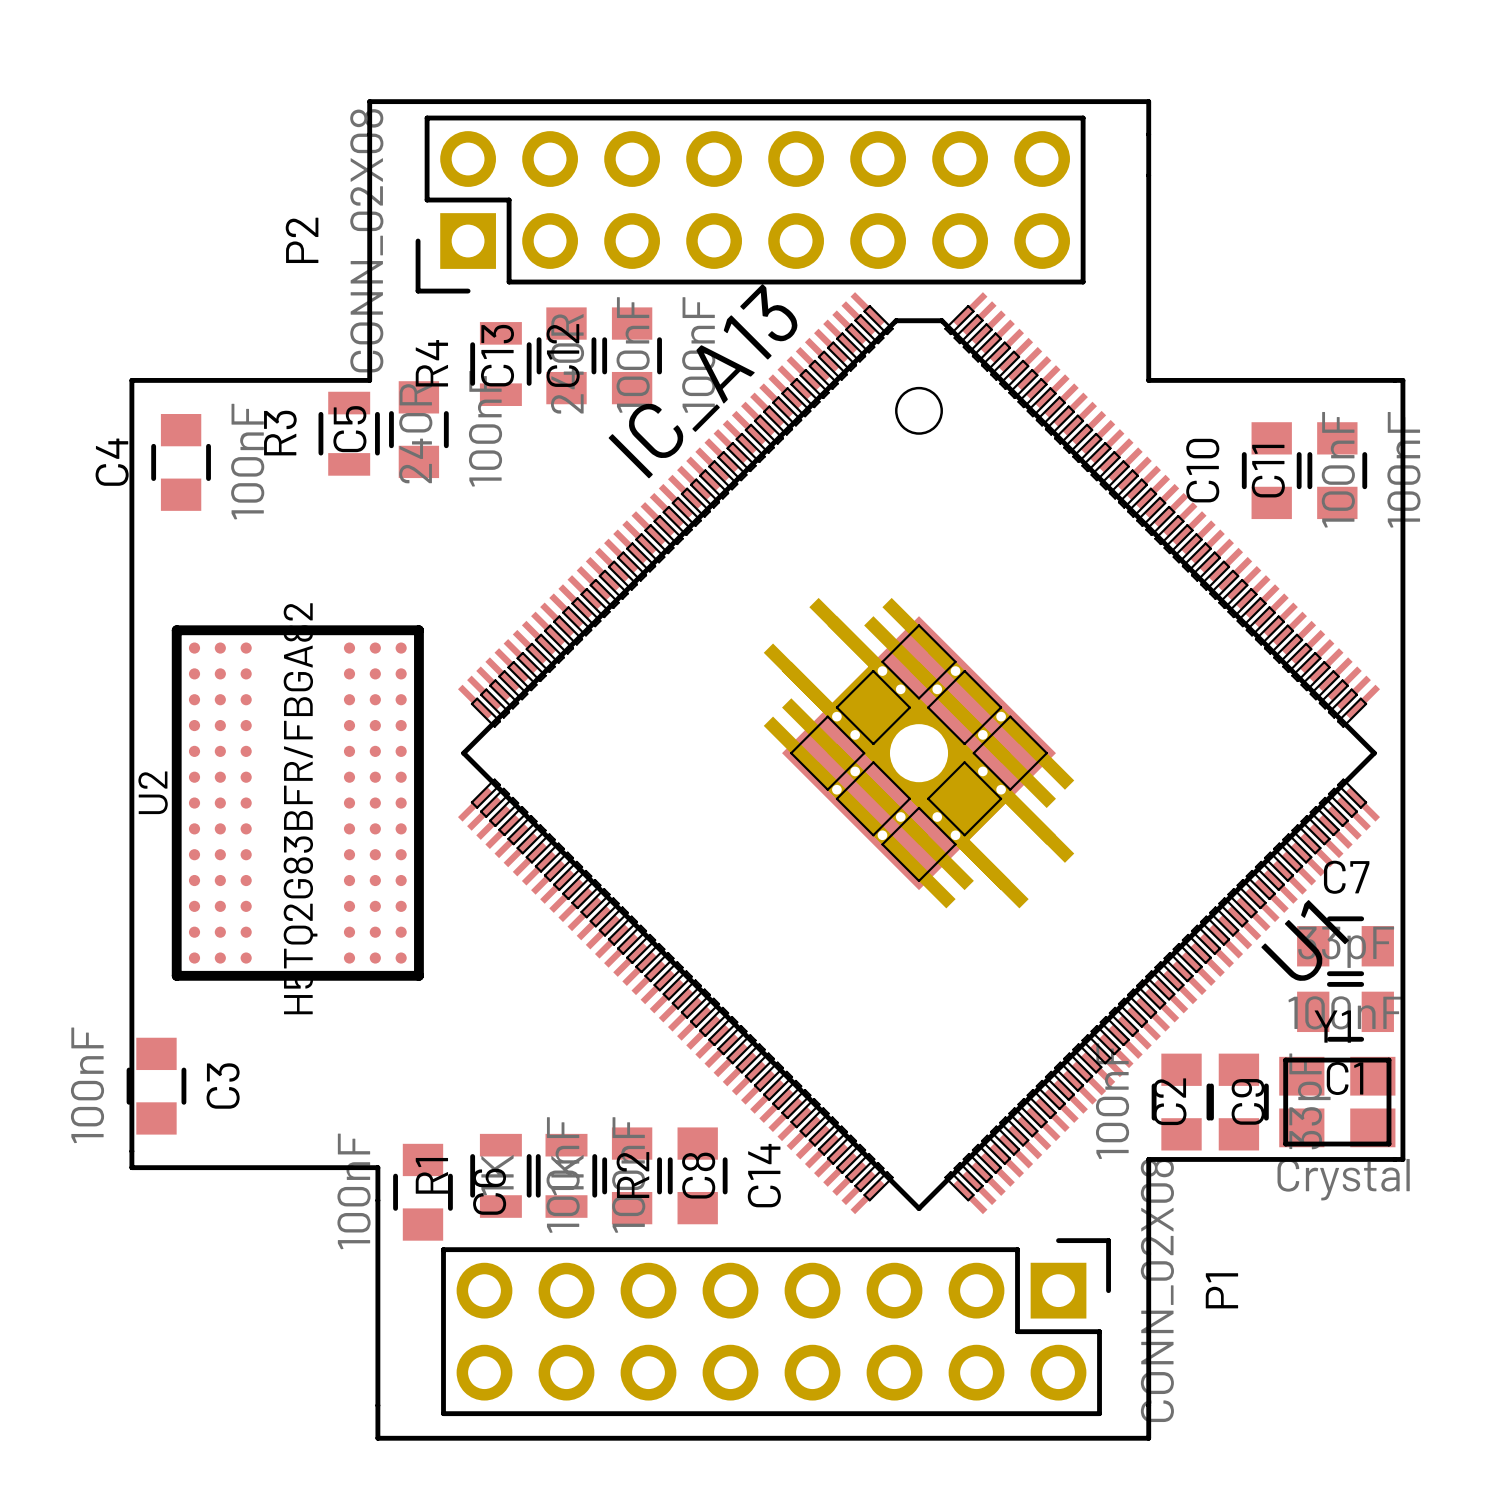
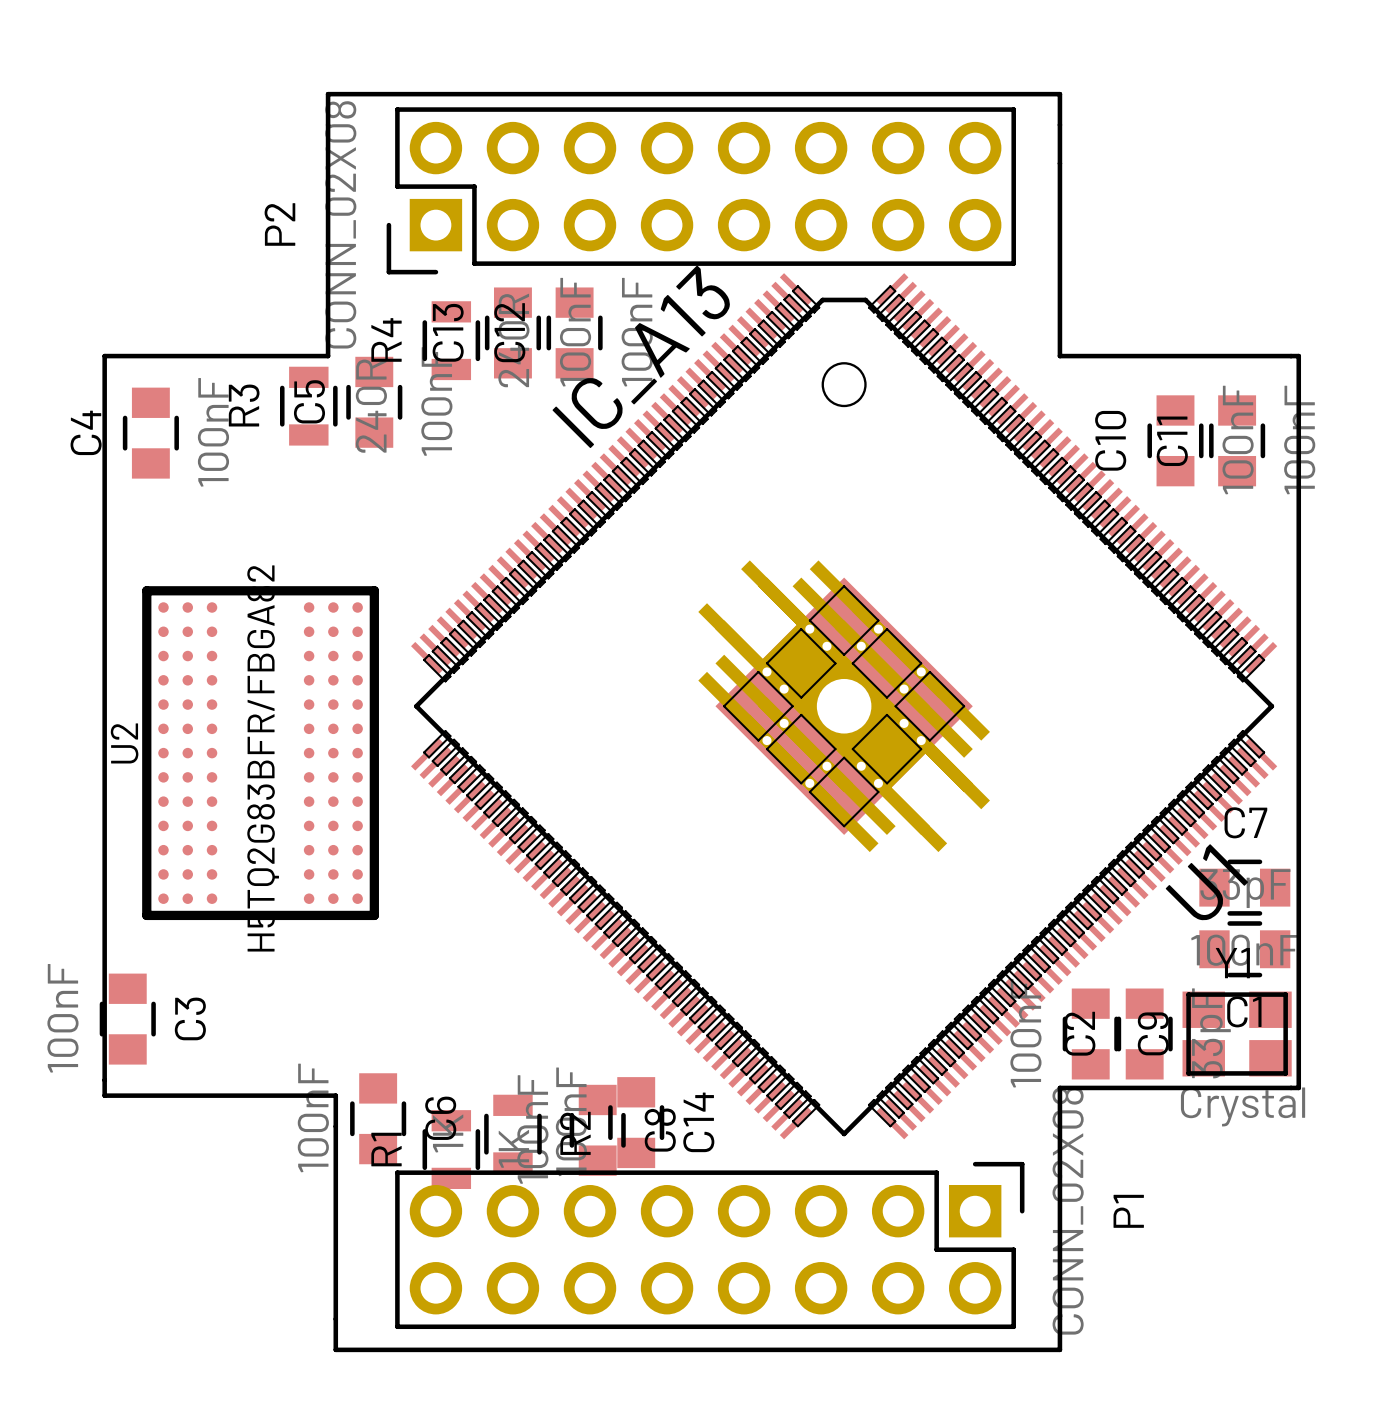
P2 position: (750, 204) -> (701, 190)
R1 position: (500, 1175) -> (451, 1149)
R2 position: (566, 1175) -> (512, 1134)
C8 position: (632, 1175) -> (597, 1130)
C14 position: (697, 1175) -> (636, 1122)

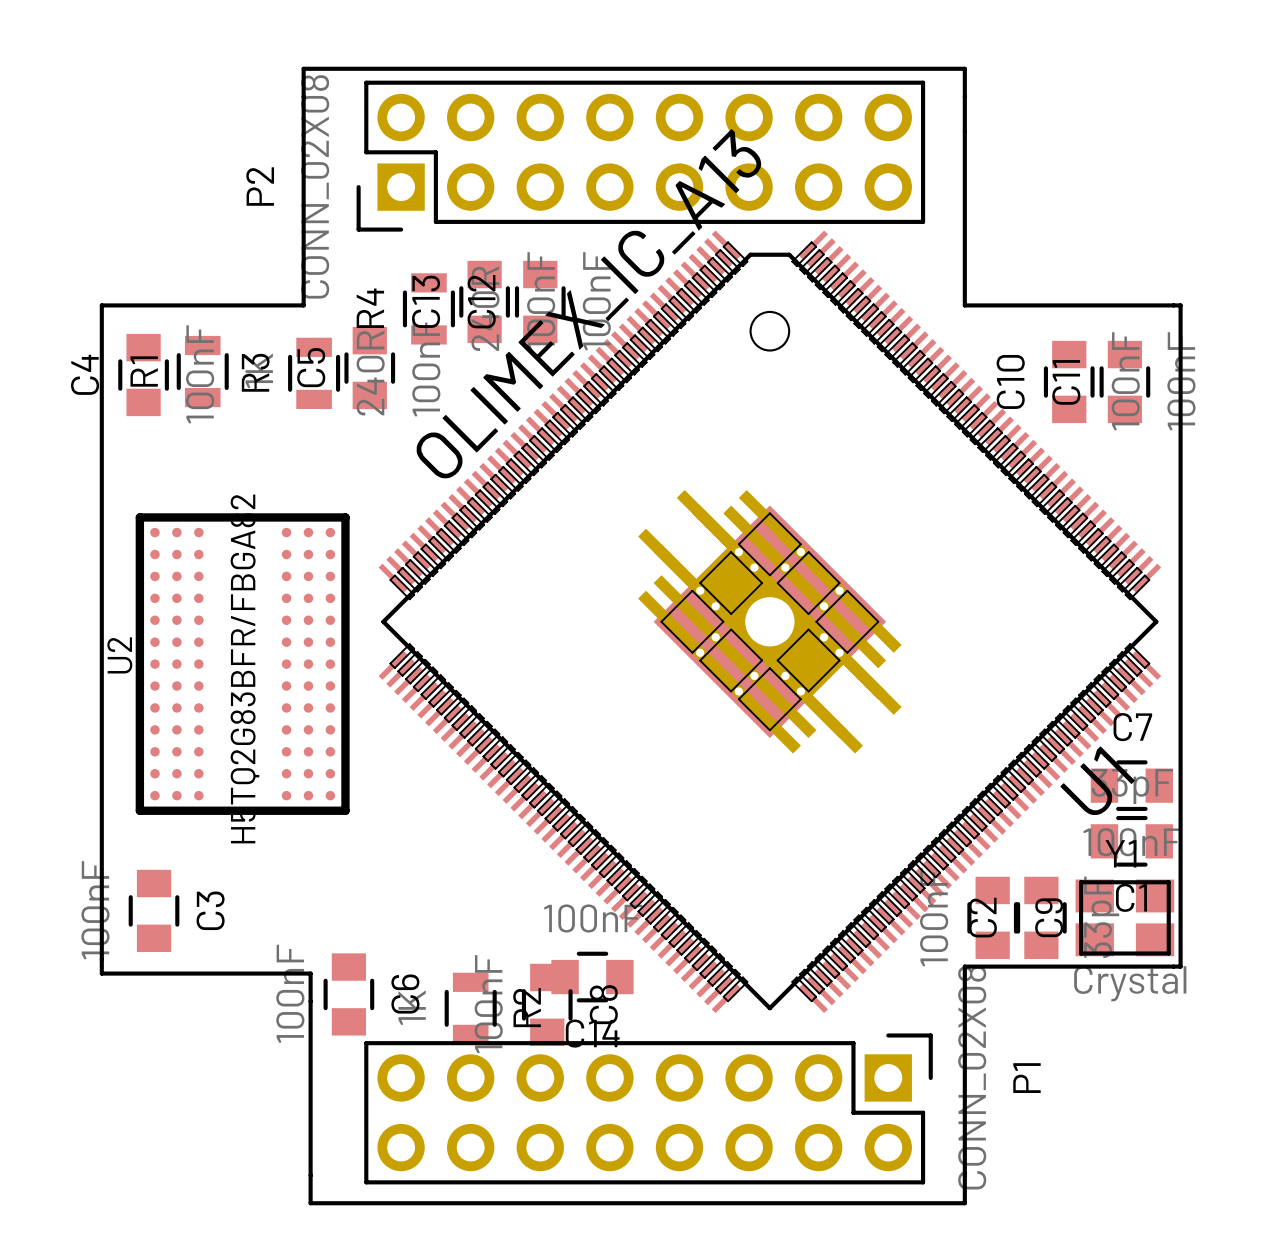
C13 position: (512, 332) -> (484, 301)
C12 position: (574, 332) -> (540, 301)
R4 position: (451, 340) -> (428, 308)
U1 value: IC_A13 (641, 356) -> OLIMEX_IC_A13 (588, 303)
C5 position: (374, 402) -> (369, 368)
R3 position: (308, 406) -> (314, 373)
C3 position: (127, 1019) -> (154, 910)
C14 rotation: 0° (636, 1122) -> 90° clockwise (592, 977)
R1 position: (451, 1149) -> (202, 371)

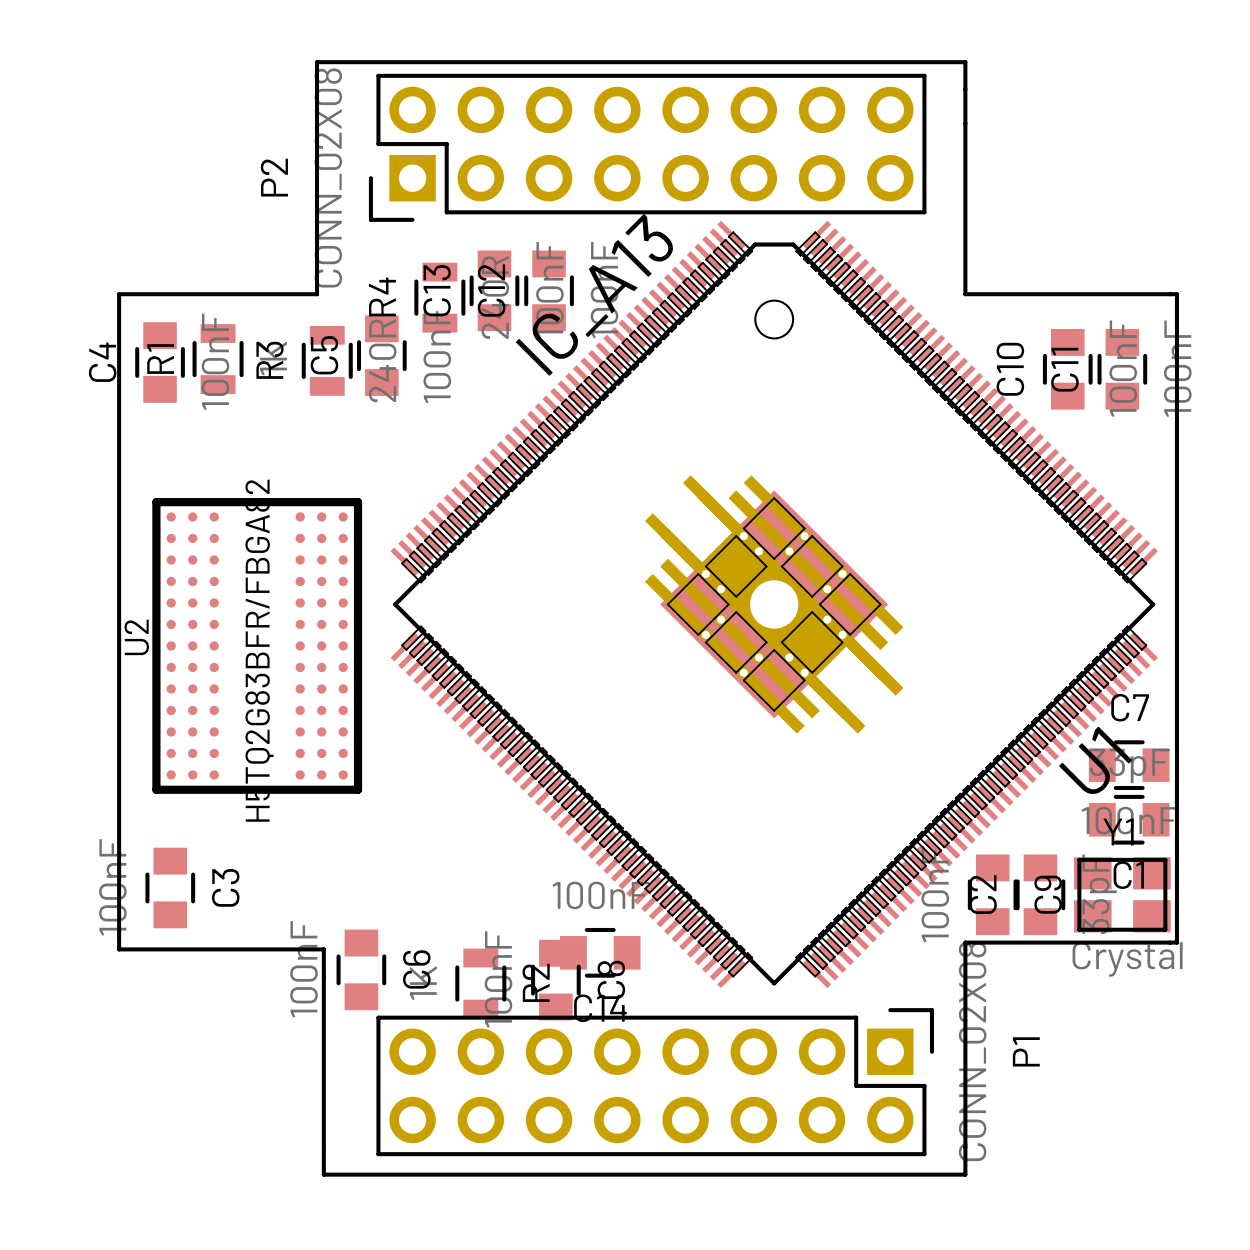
U1 value: OLIMEX_IC_A13 (588, 303) -> IC_A13 (594, 294)

